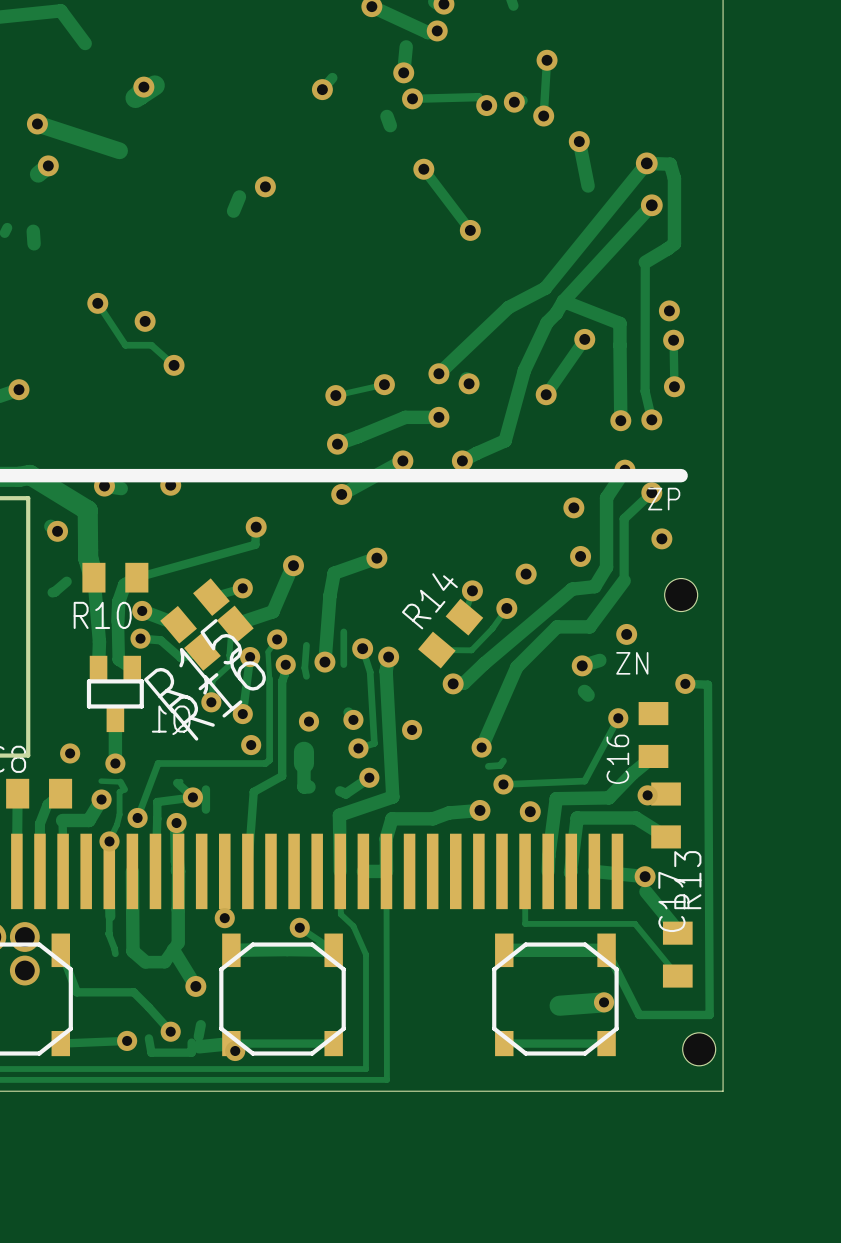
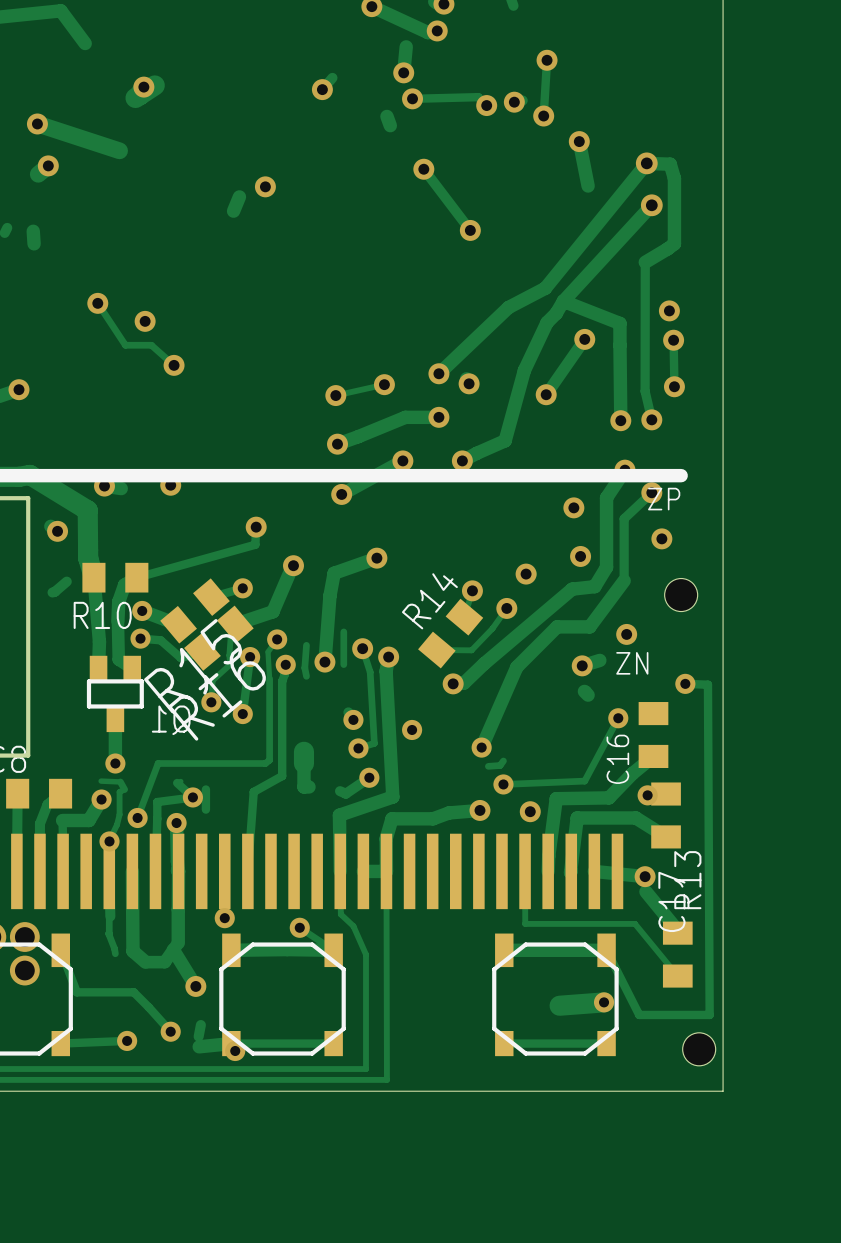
via: (309, 721) -> none
via: (251, 745) -> none
via: (70, 753) -> none
track: (148, 1038) (151, 1052) (191, 1052) (191, 1042) -> none

